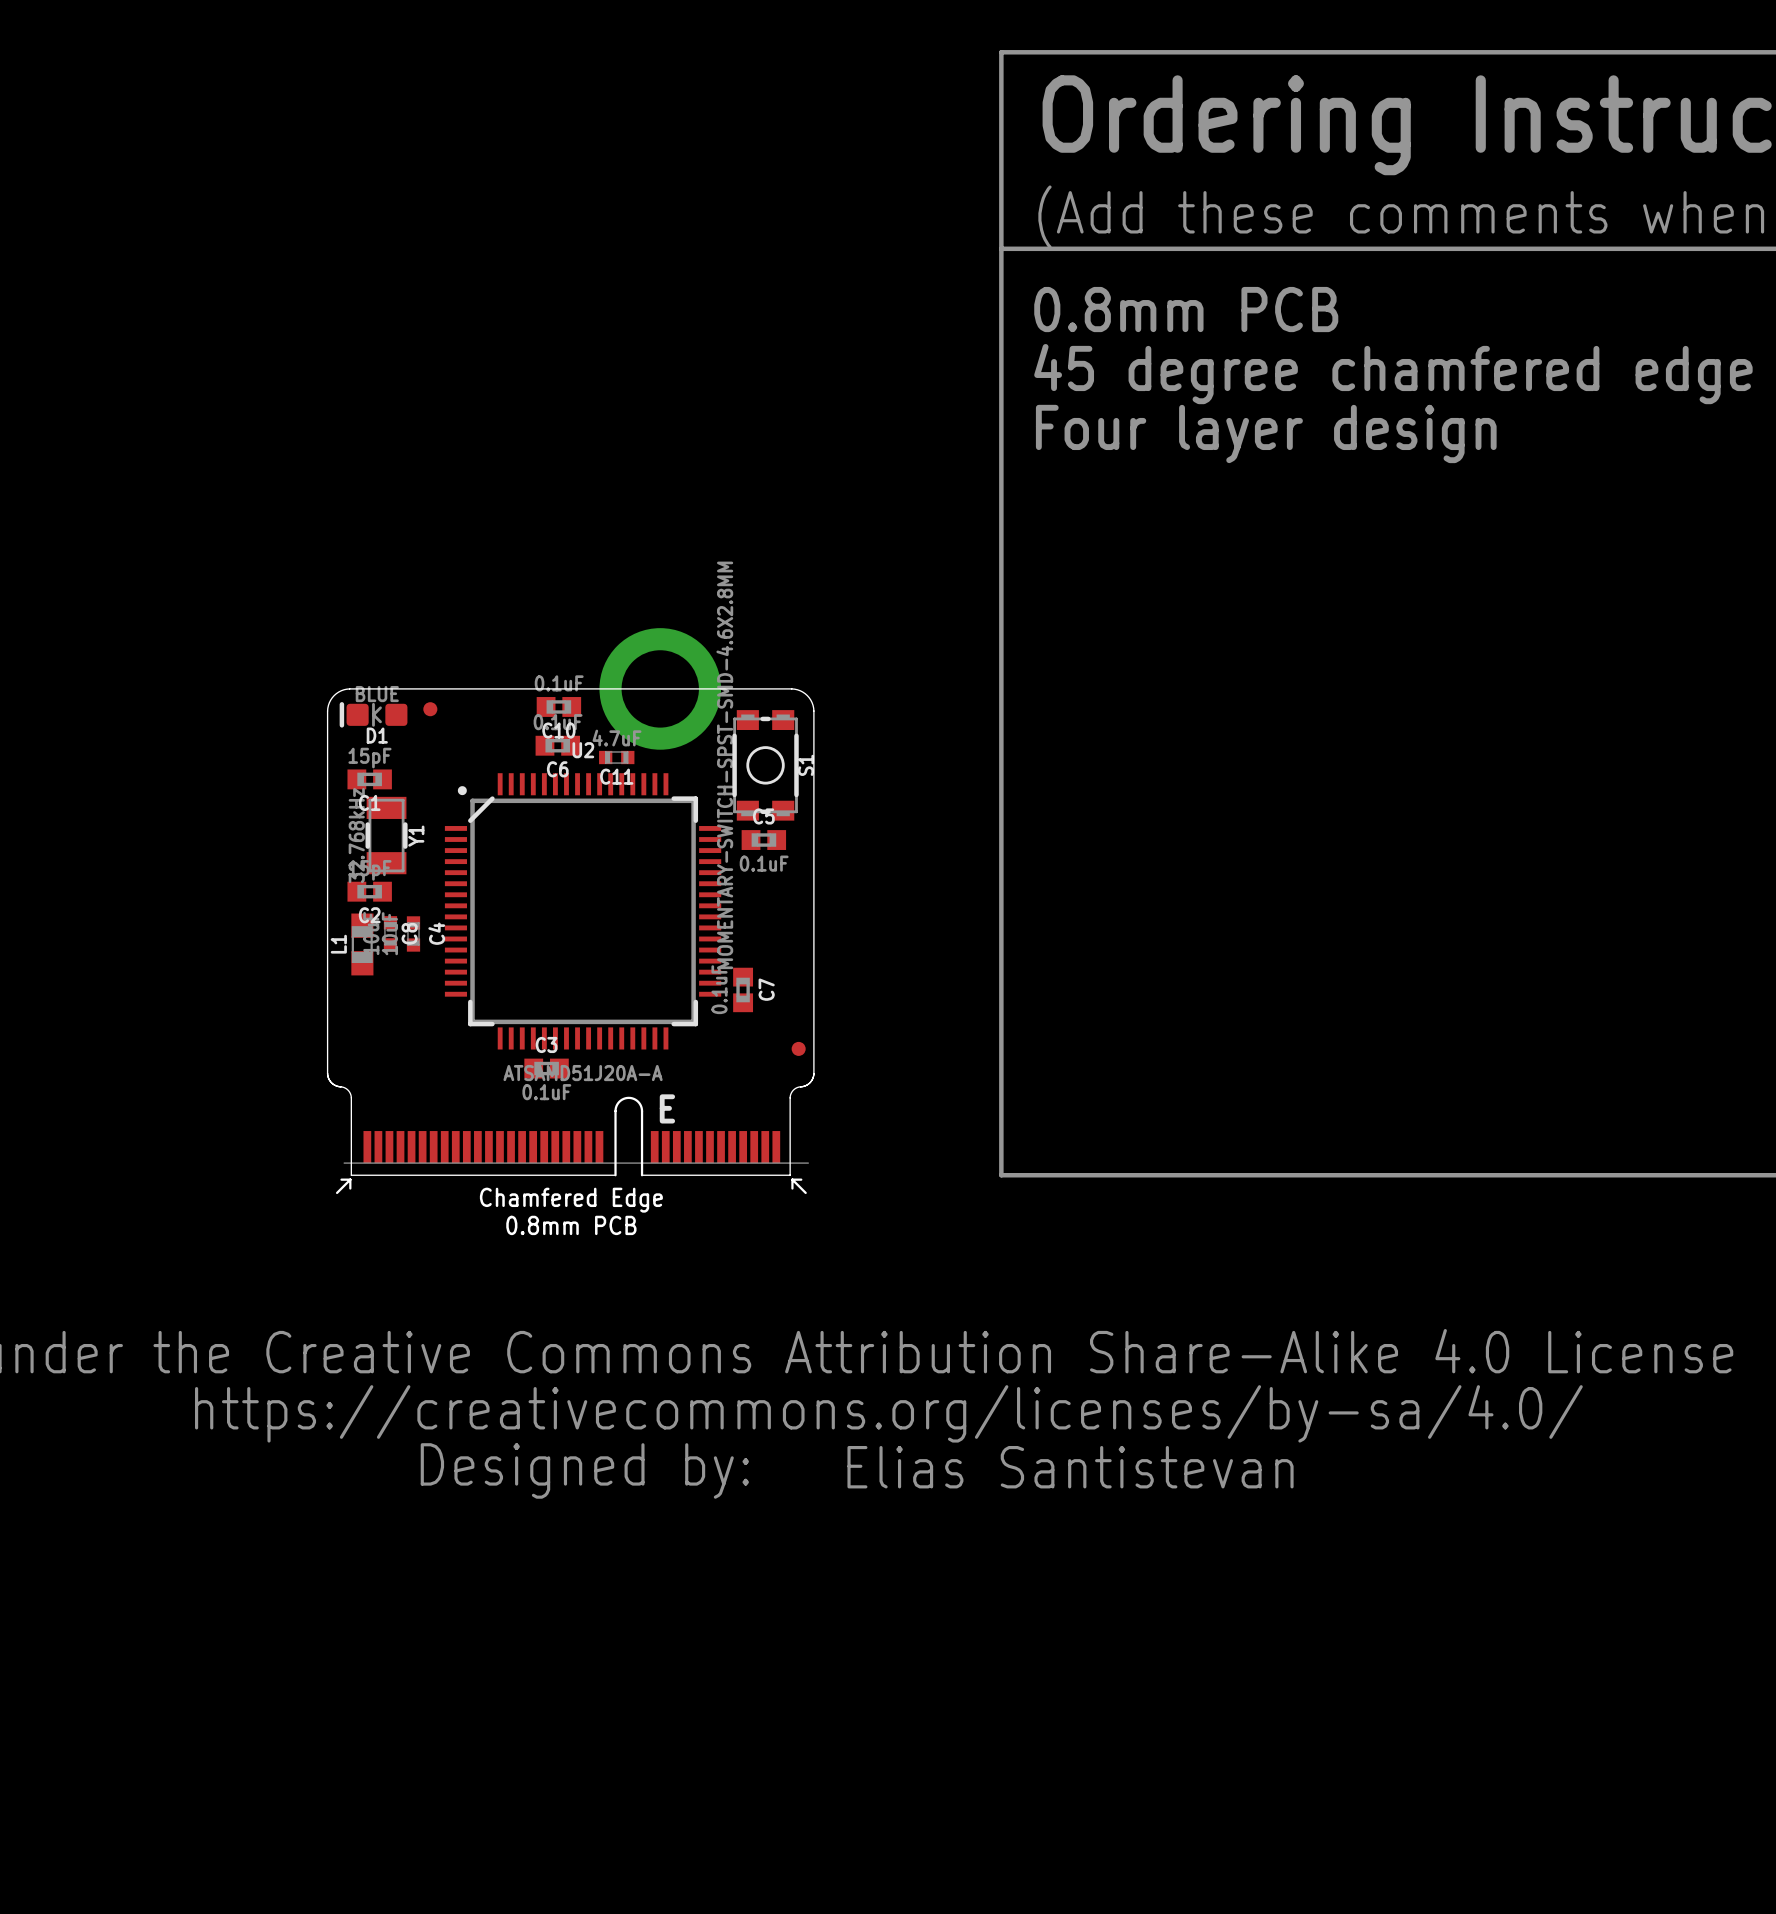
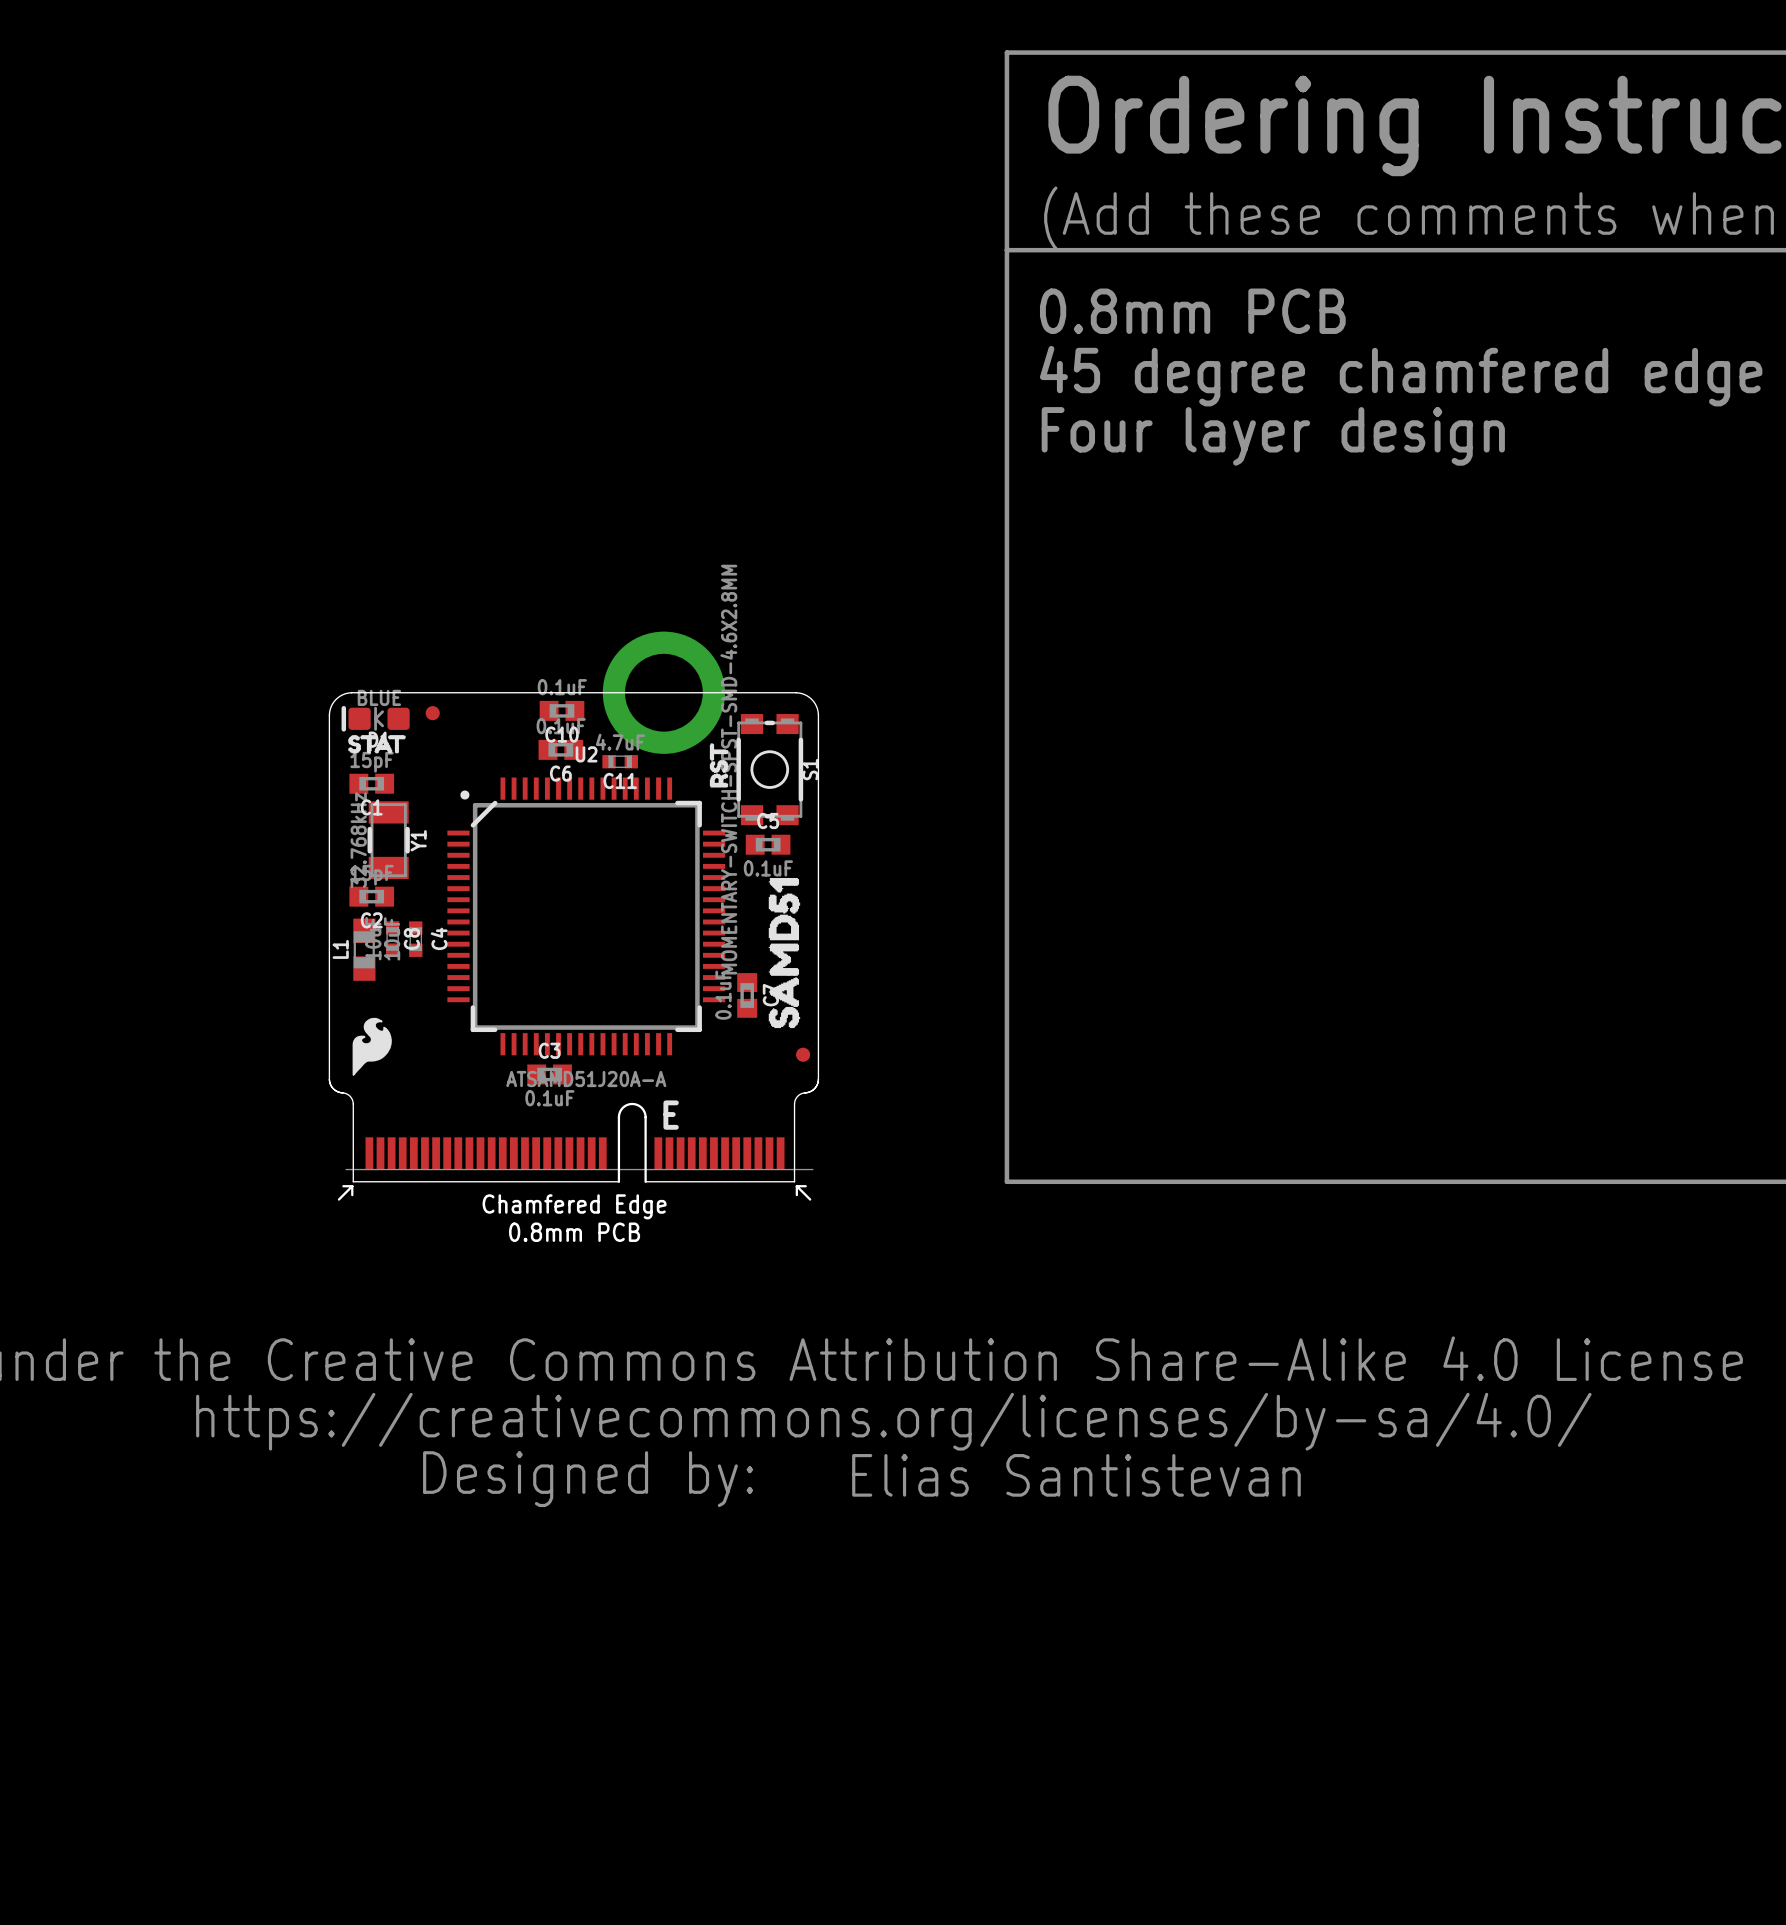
drawing: none -> [348, 735, 406, 754]
drawing: none -> [709, 743, 729, 788]
drawing: none -> [768, 878, 801, 1029]
drawing: none -> [352, 1017, 392, 1076]

